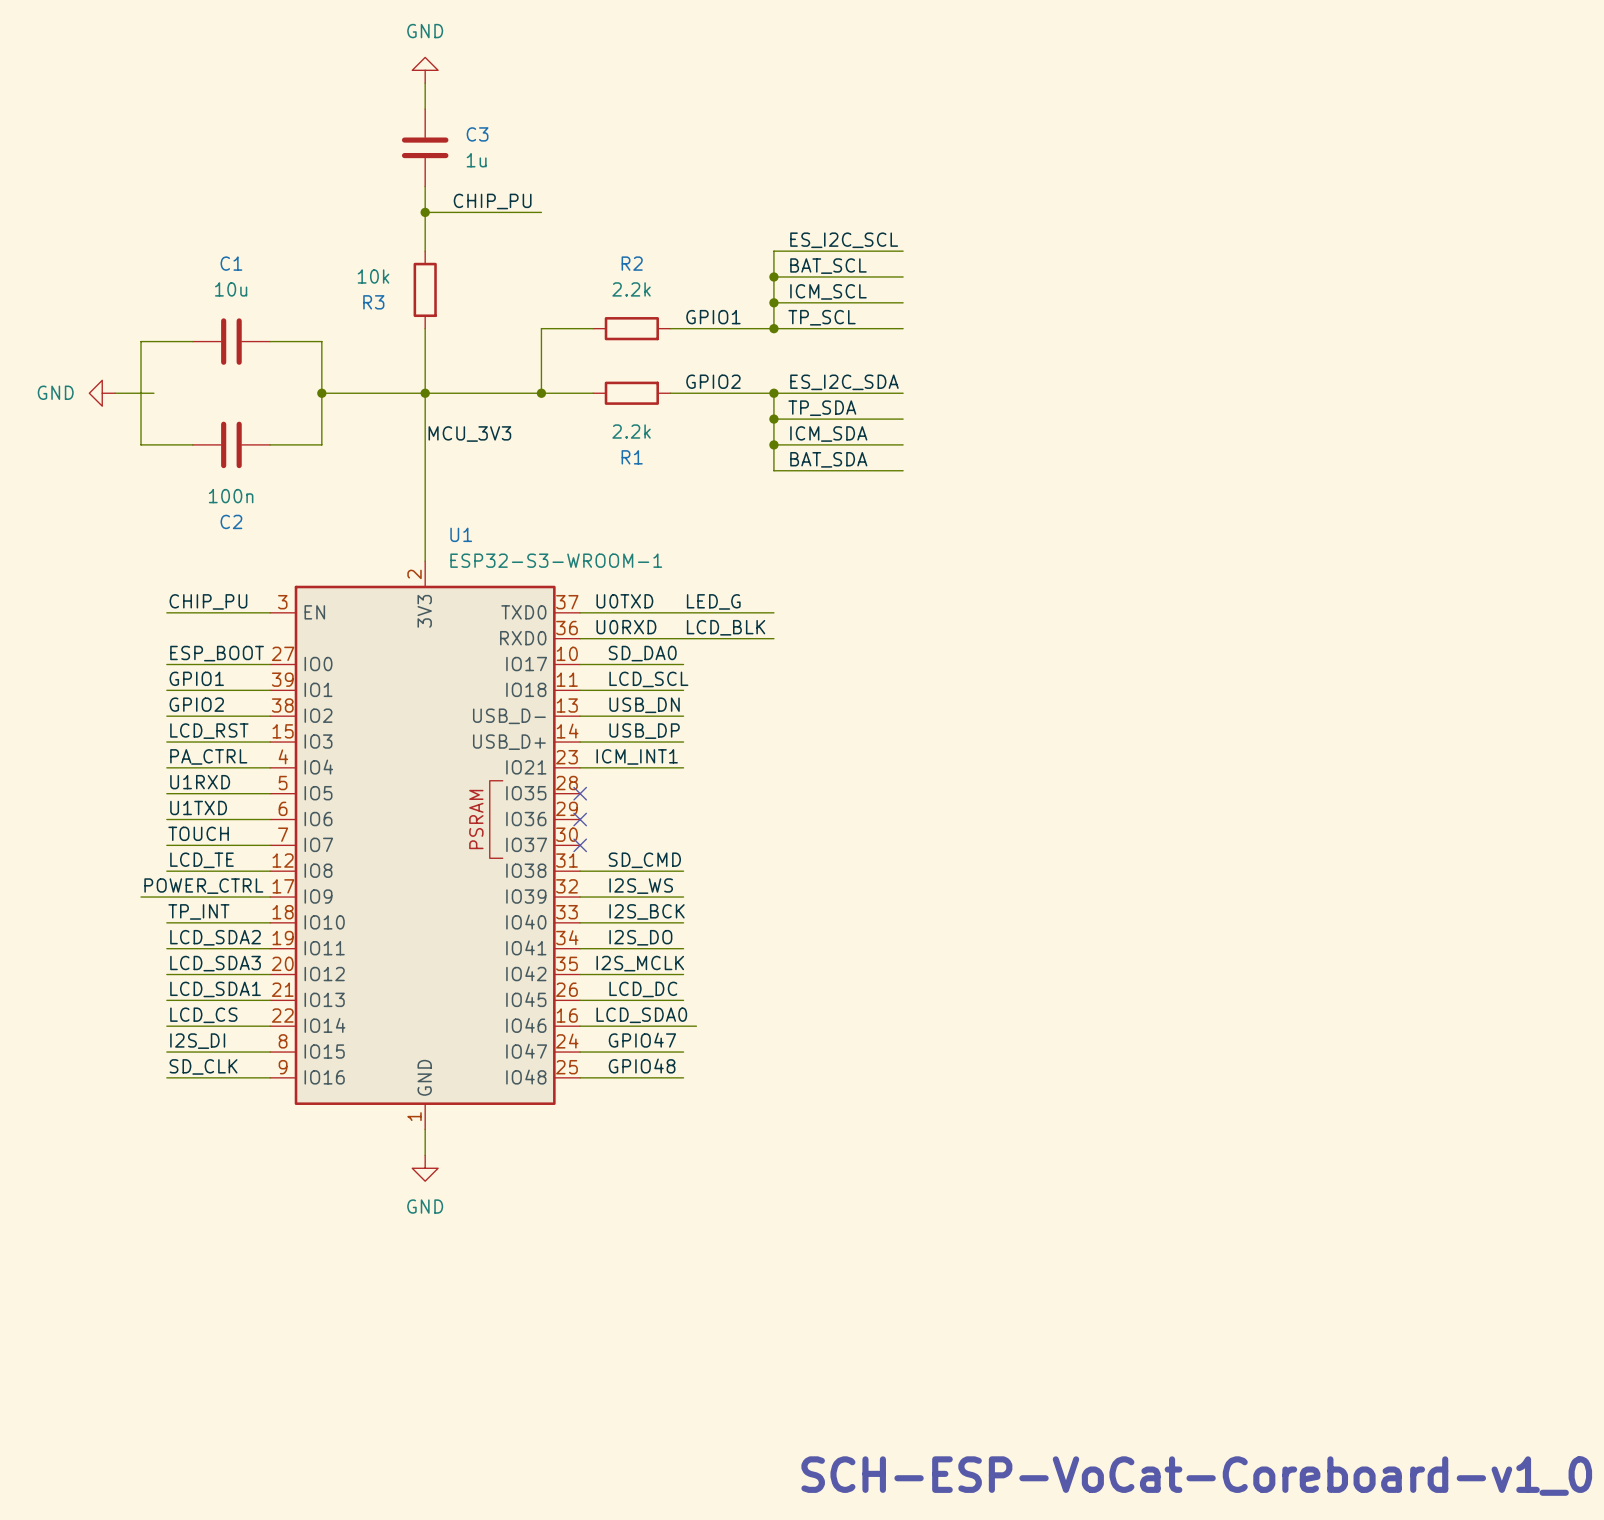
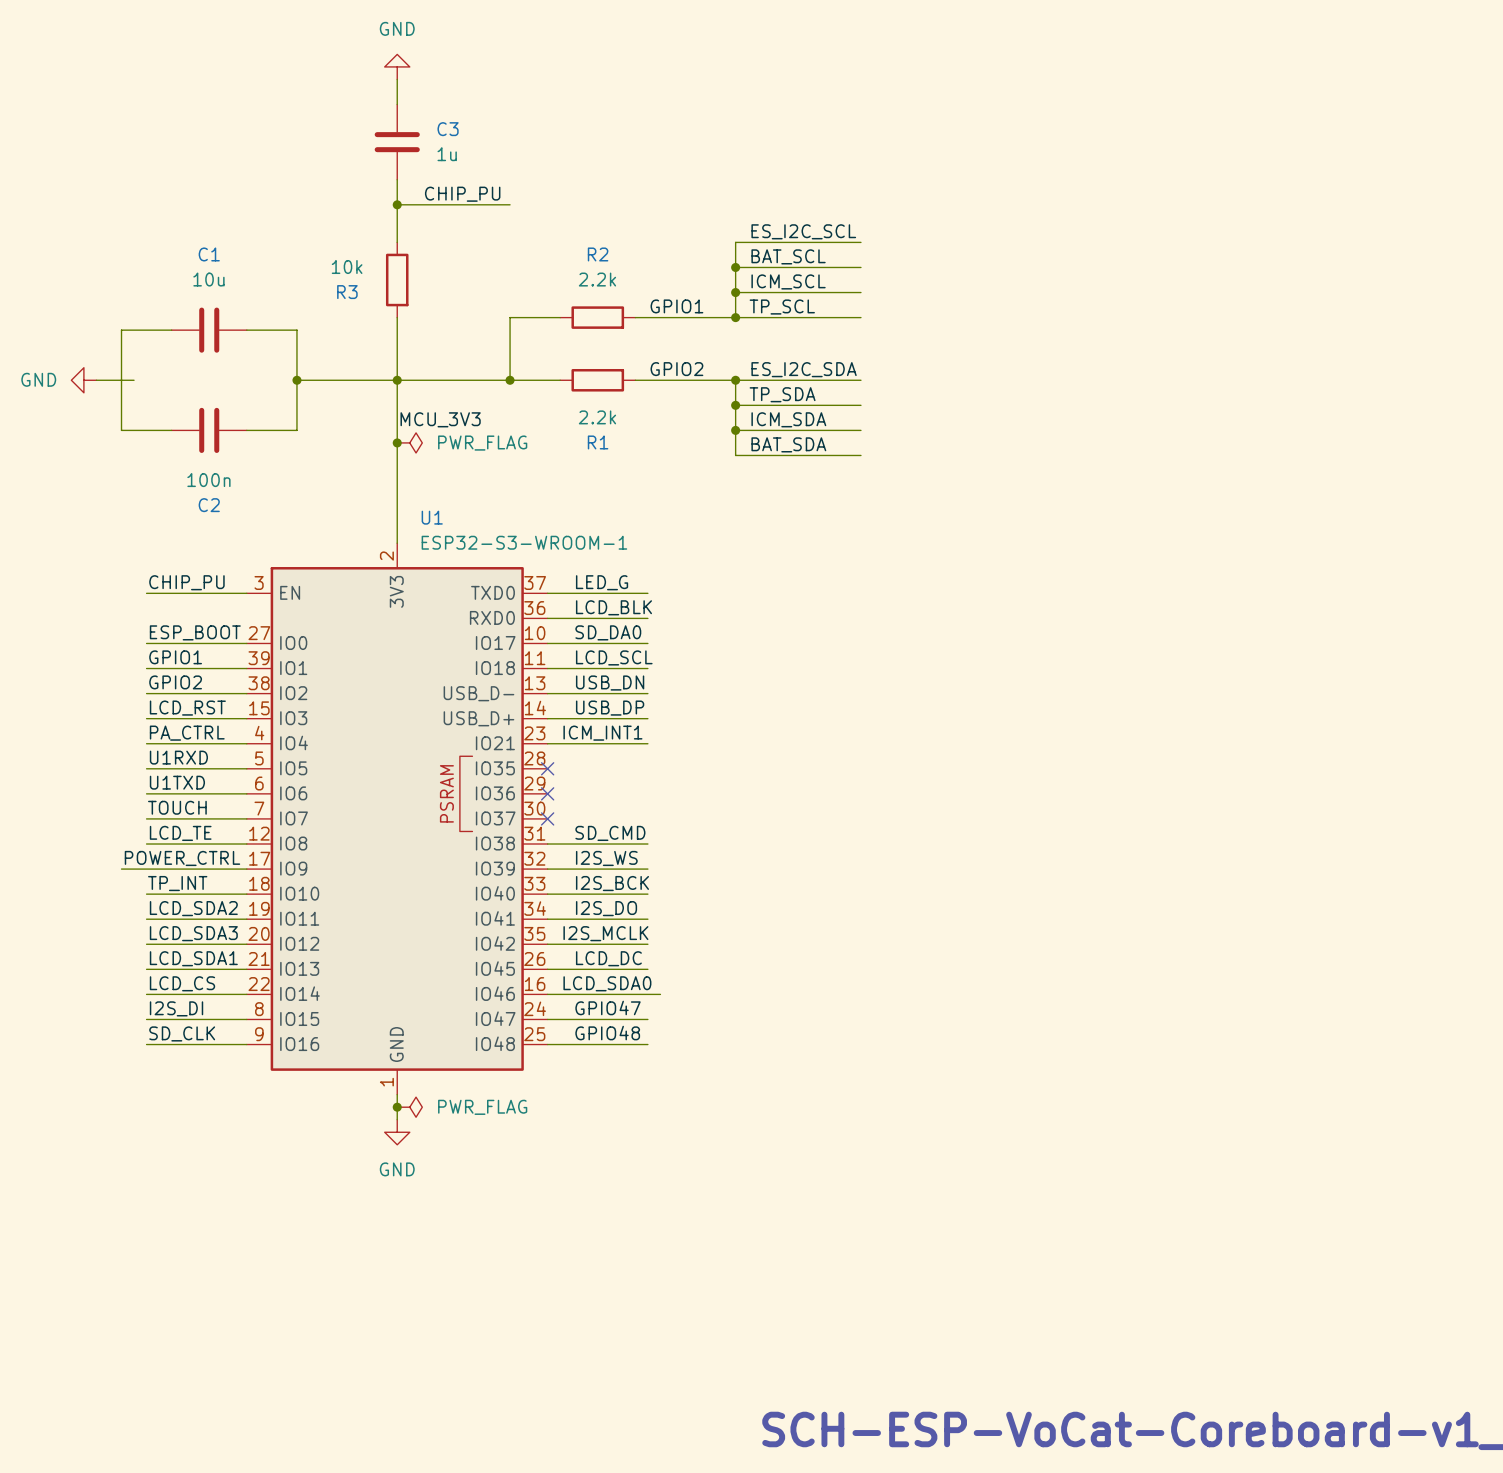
junction: none -> (397, 442)
power symbol: none -> PWR_FLAG (409, 442)
label: U0TXD (624, 601) -> none
label position: LED_G (713, 601) -> LED_G (602, 582)
wire: (683, 612) (773, 612) -> none
label: U0RXD (626, 627) -> none
label position: LCD_BLK (726, 627) -> LCD_BLK (613, 607)
wire: (683, 638) (773, 638) -> none
junction: none -> (397, 1107)
power symbol: none -> PWR_FLAG (409, 1107)

